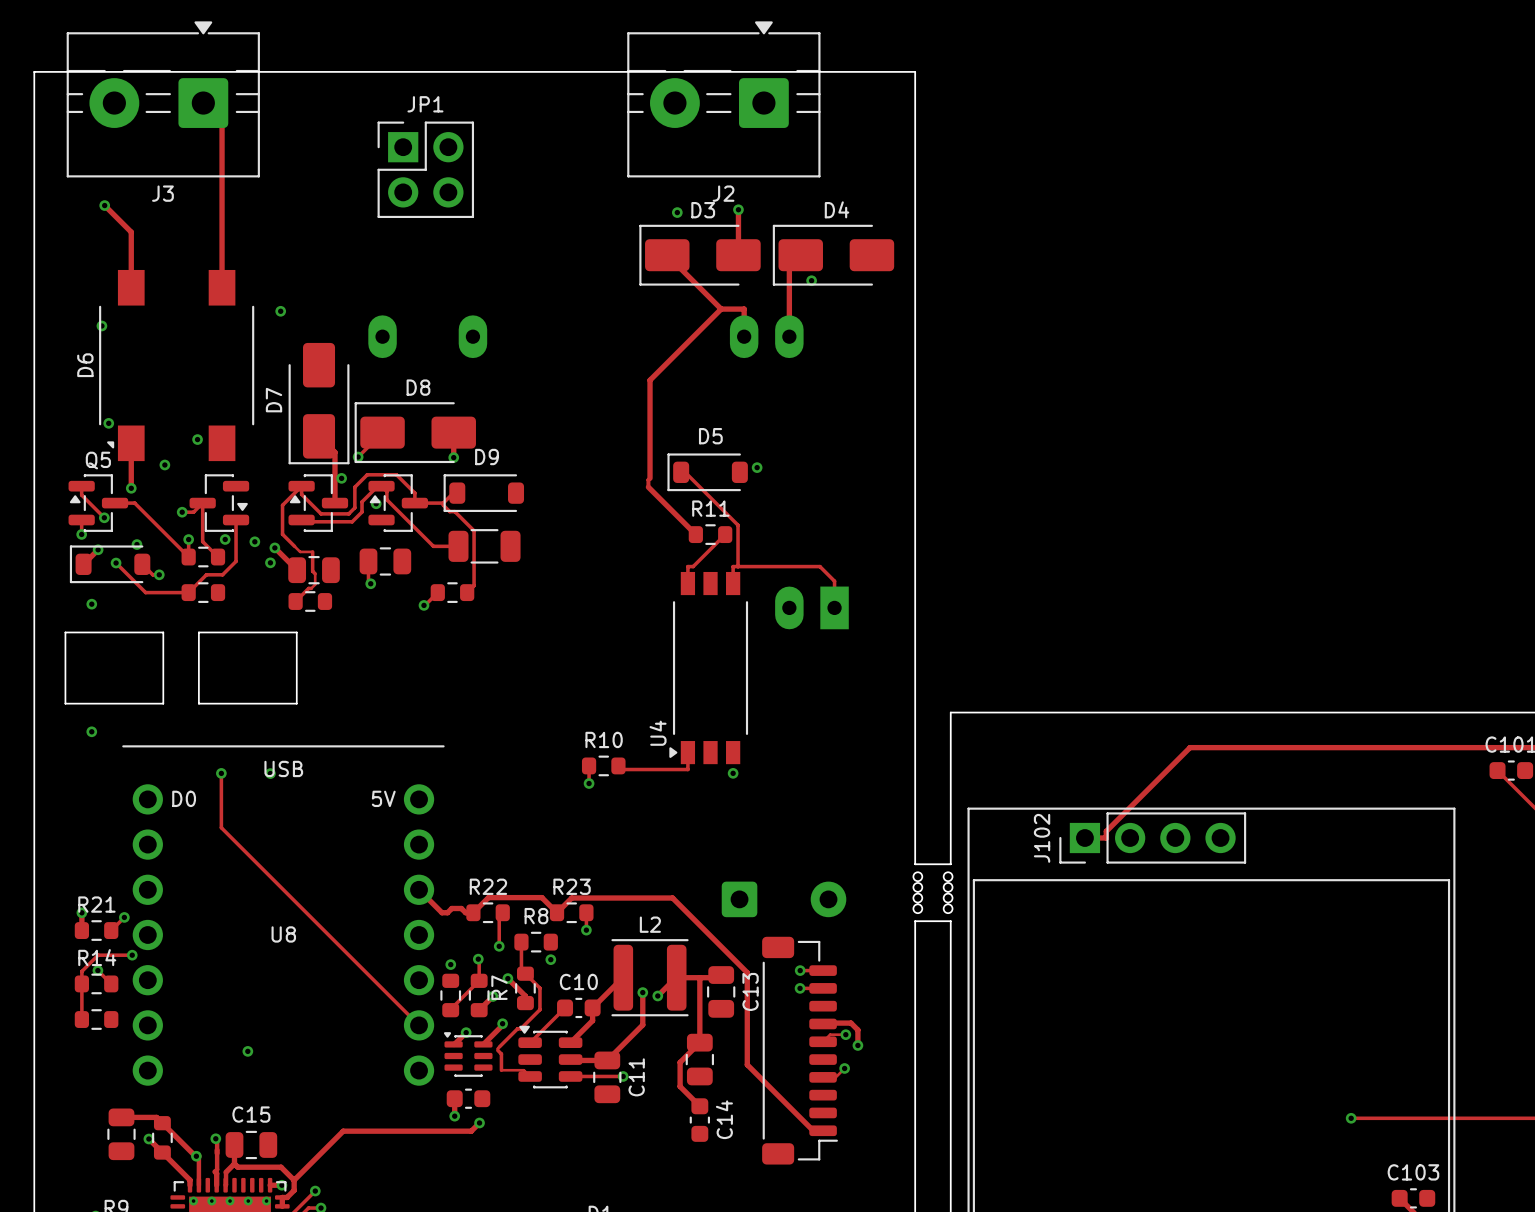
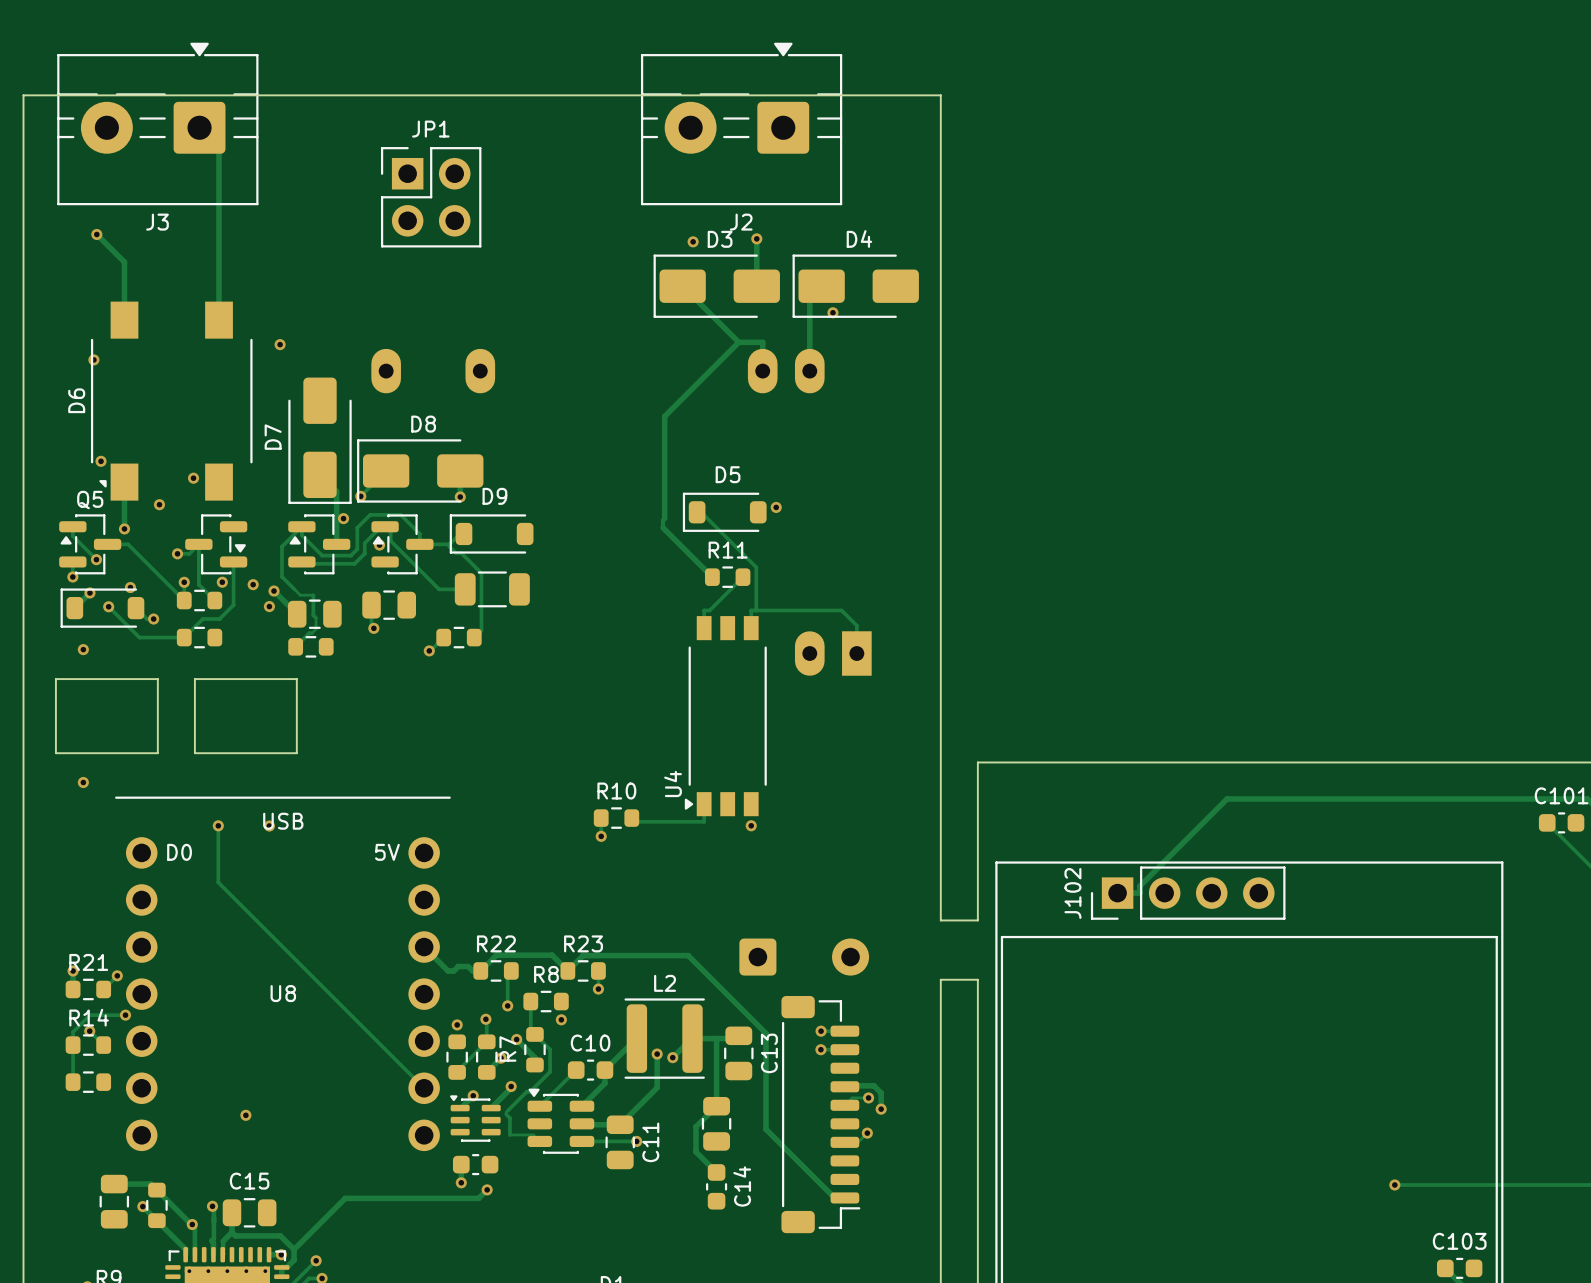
part: (917, 876) -> none
part: (948, 876) -> none
part: (917, 887) -> none
part: (948, 887) -> none
part: (917, 898) -> none
part: (948, 898) -> none
part: (917, 908) -> none
part: (948, 908) -> none

